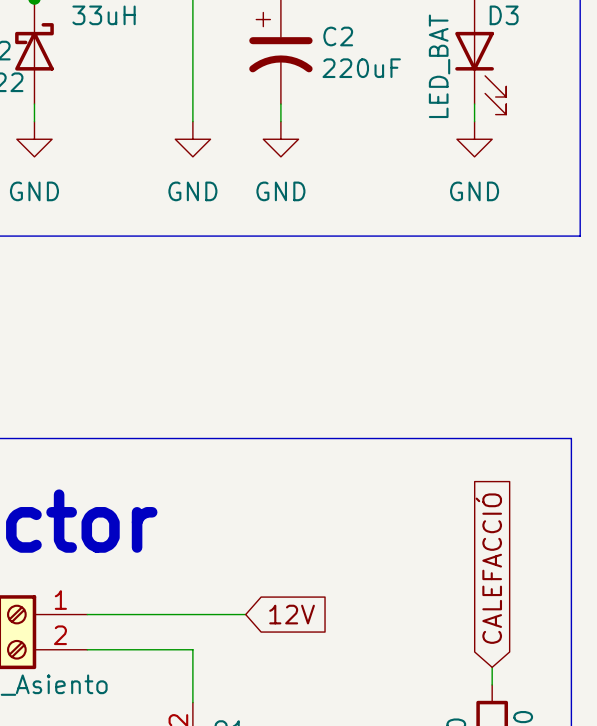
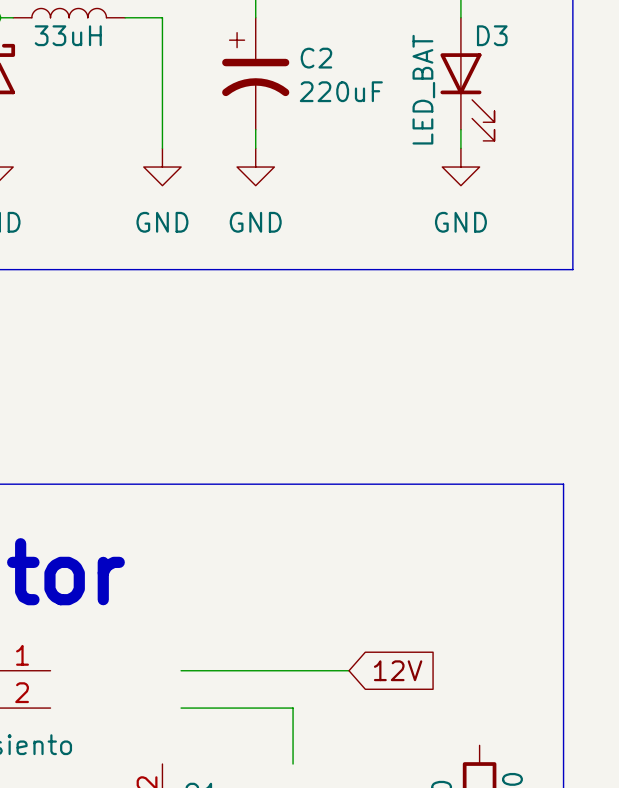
global label: CALEFACCIÓ (488, 568) -> none
wire: (87, 614) (210, 614) -> (218, 670) (349, 670)
global label position: 12V (292, 614) -> 12V (398, 670)
wire: (87, 649) (192, 649) (192, 702) -> (181, 708) (293, 708) (293, 764)
wire: (492, 667) (492, 684) -> none

